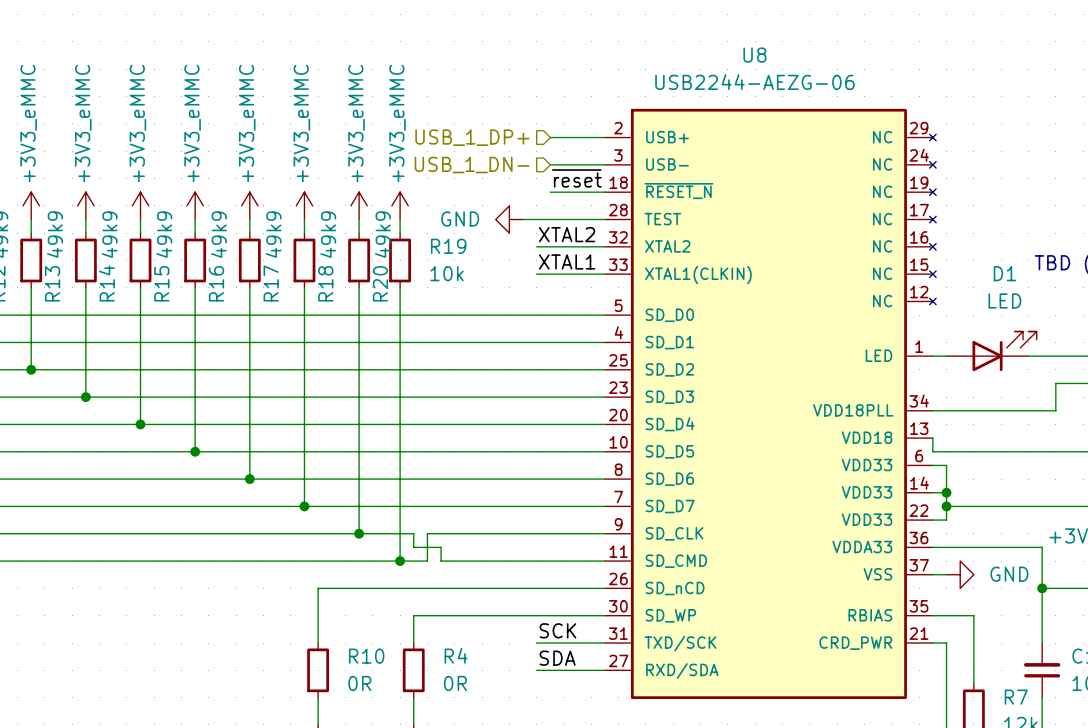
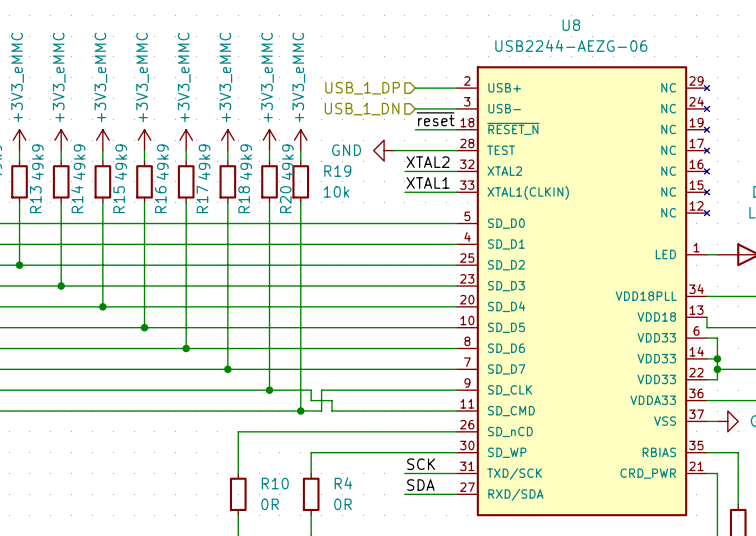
hierarchical label: USB_1_DP+ (472, 137) -> USB_1_DP (362, 88)
hierarchical label: USB_1_DN- (472, 165) -> USB_1_DN (362, 109)

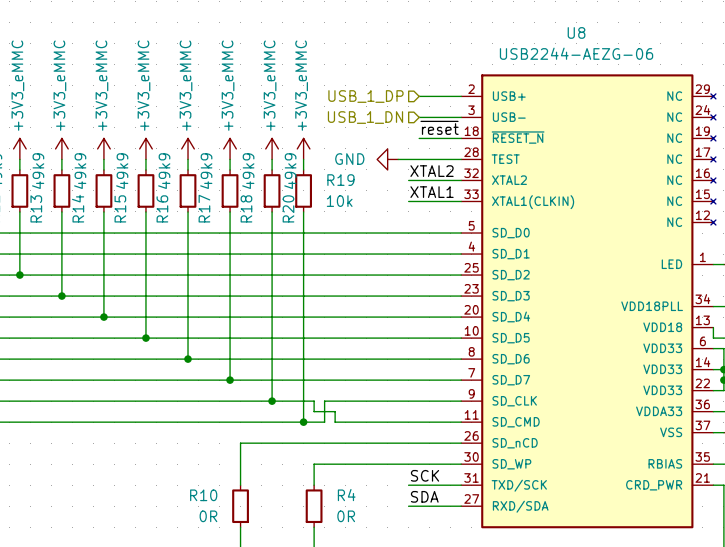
R10 name position: R10 (275, 483) -> R10 (203, 495)
R10 text position: 0R (270, 504) -> 0R (208, 516)

